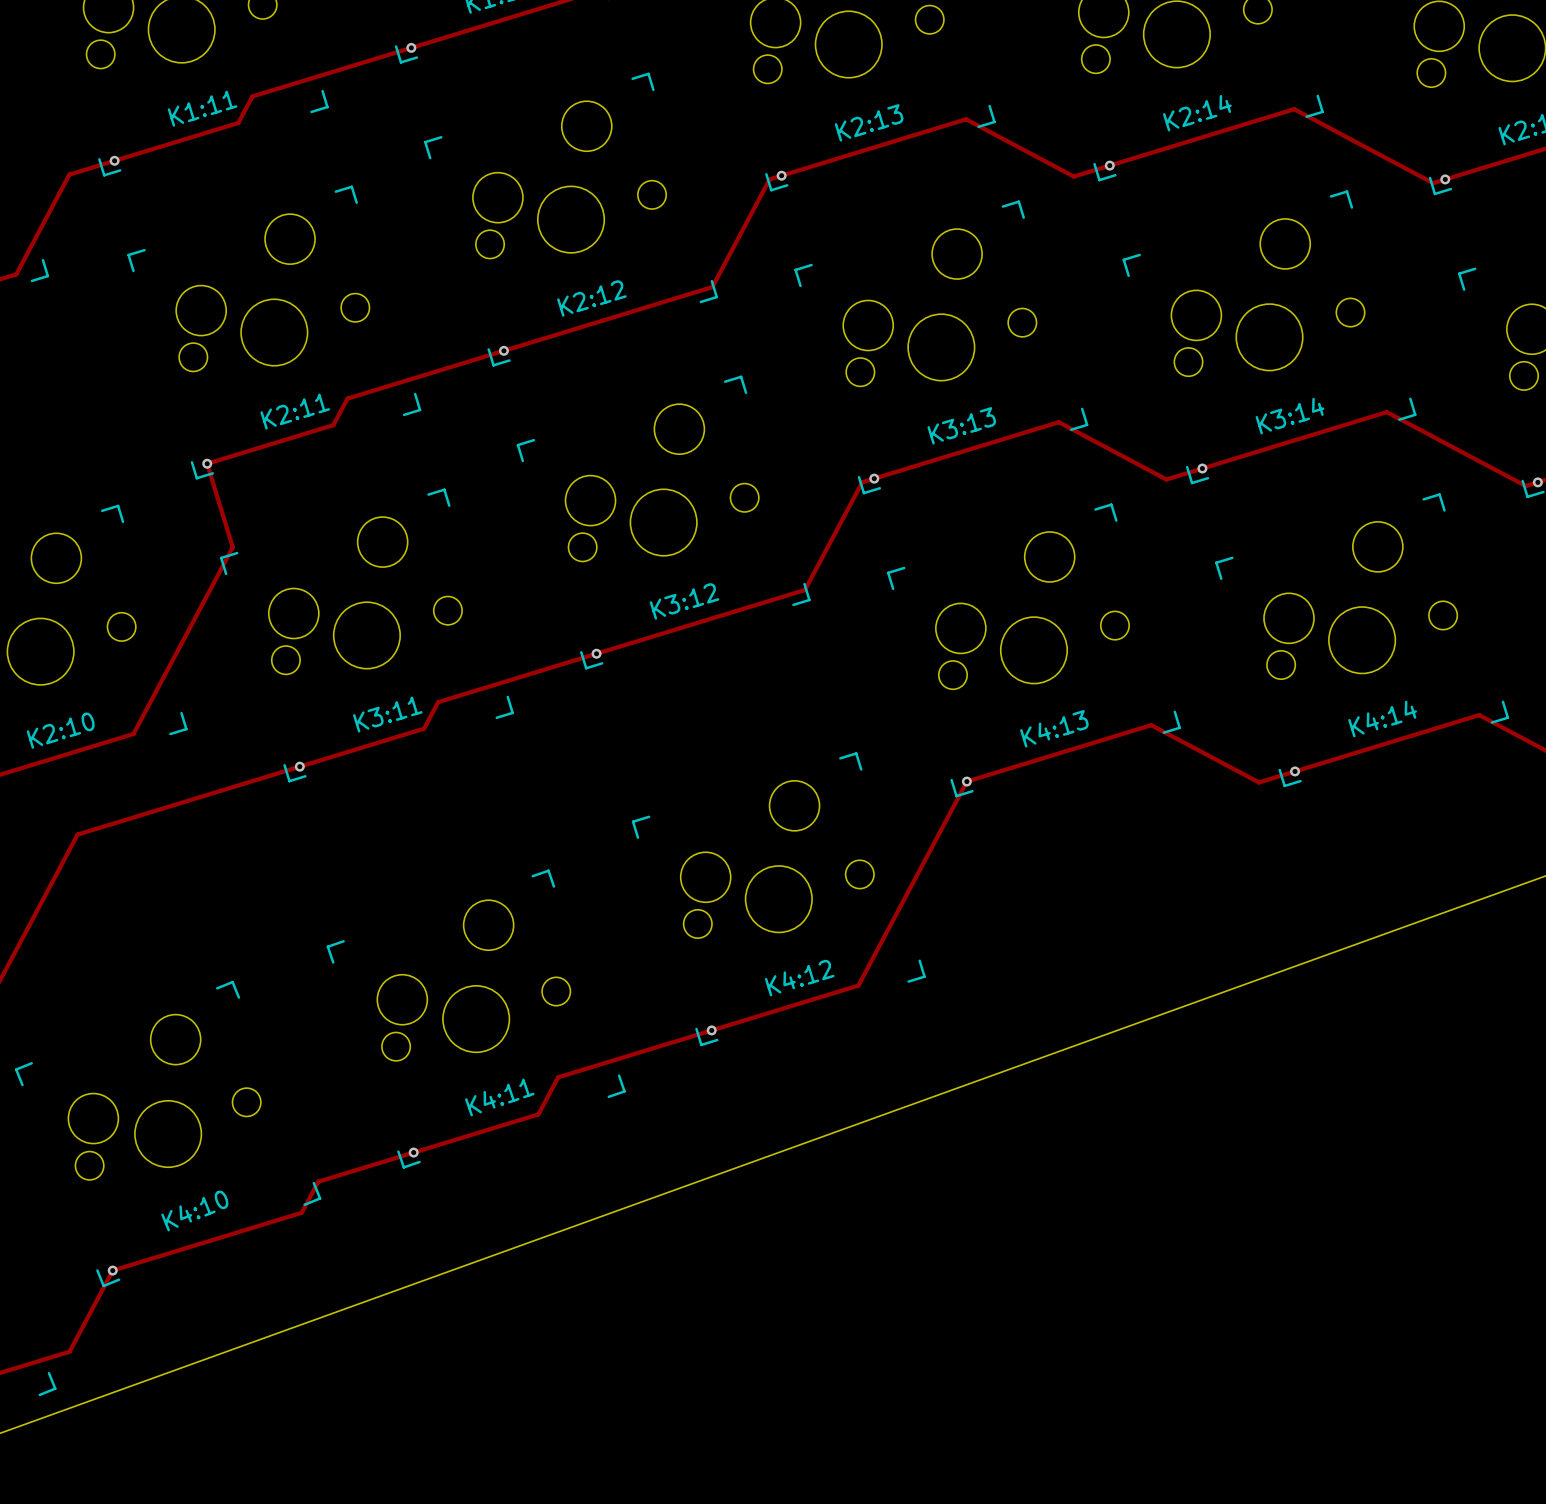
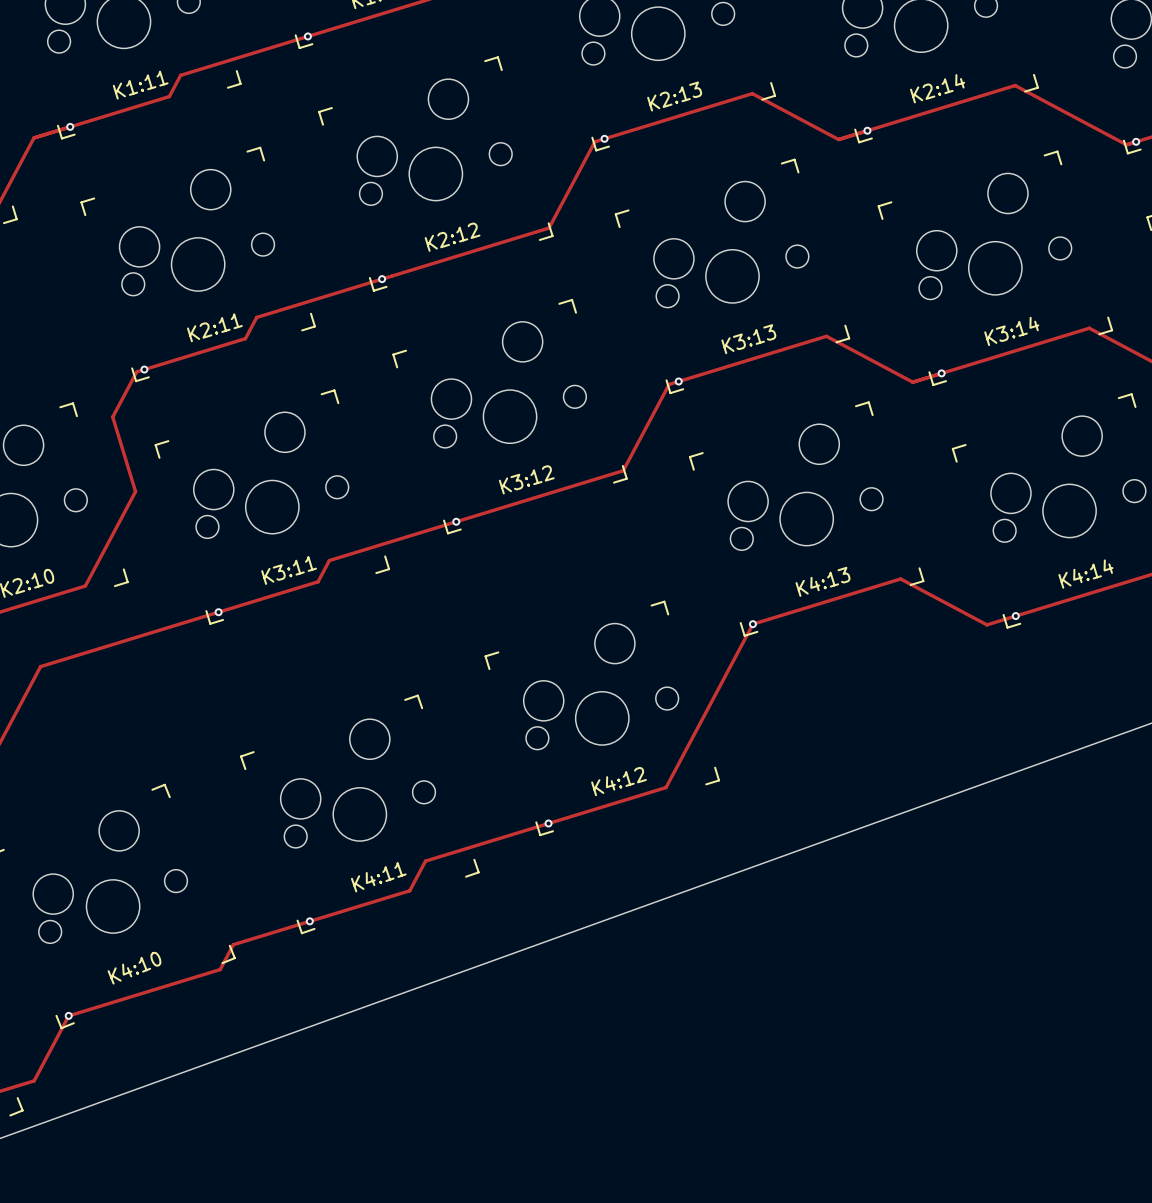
track: (207, 463) (232, 547) (196, 616) -> (144, 369) (136, 371) (112, 417) (135, 491)

